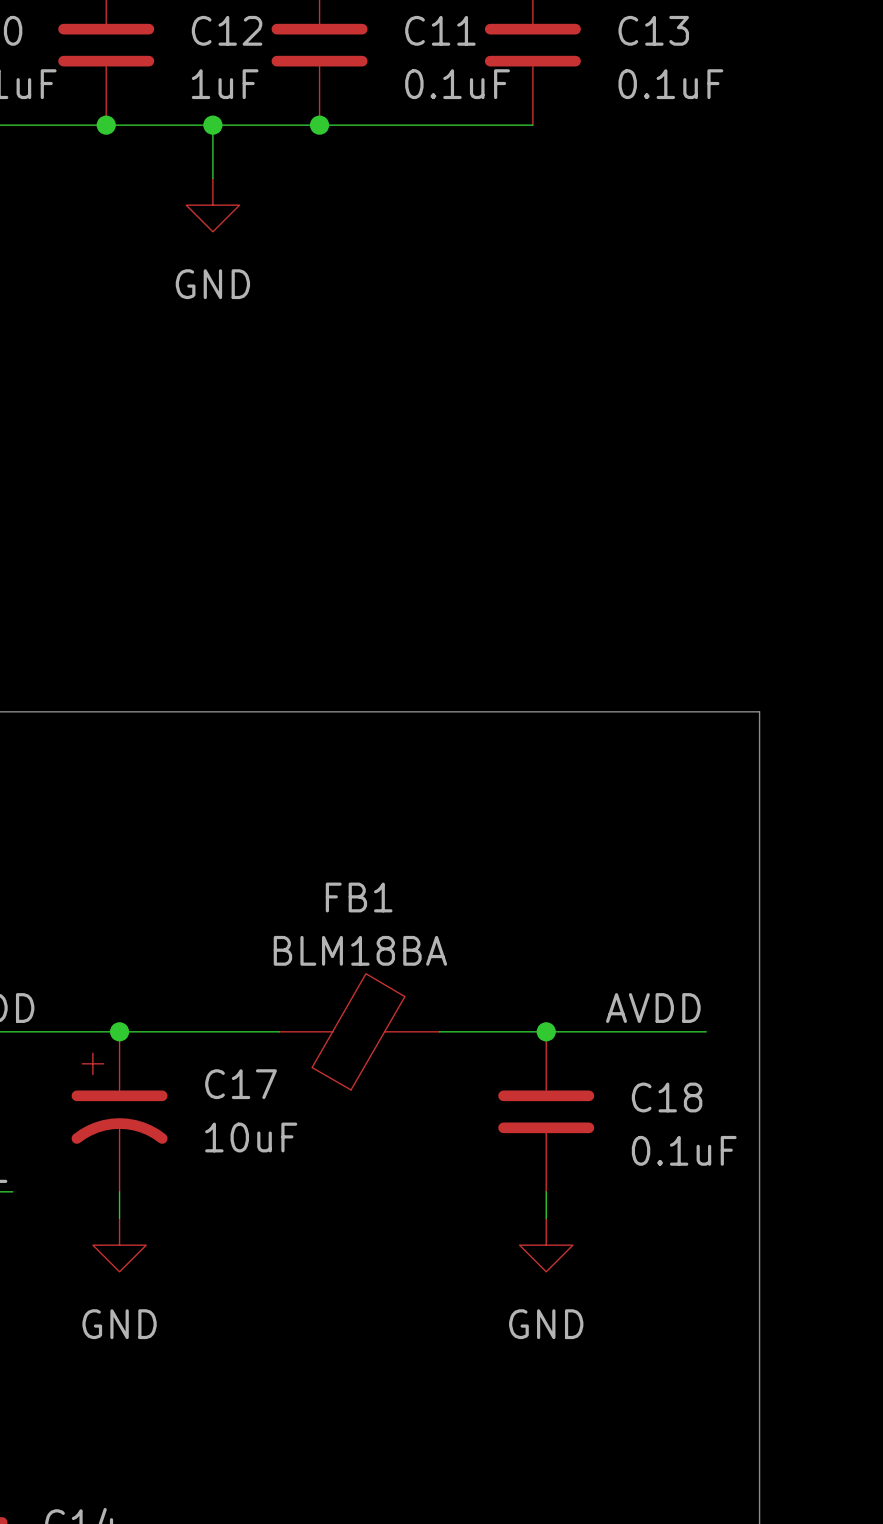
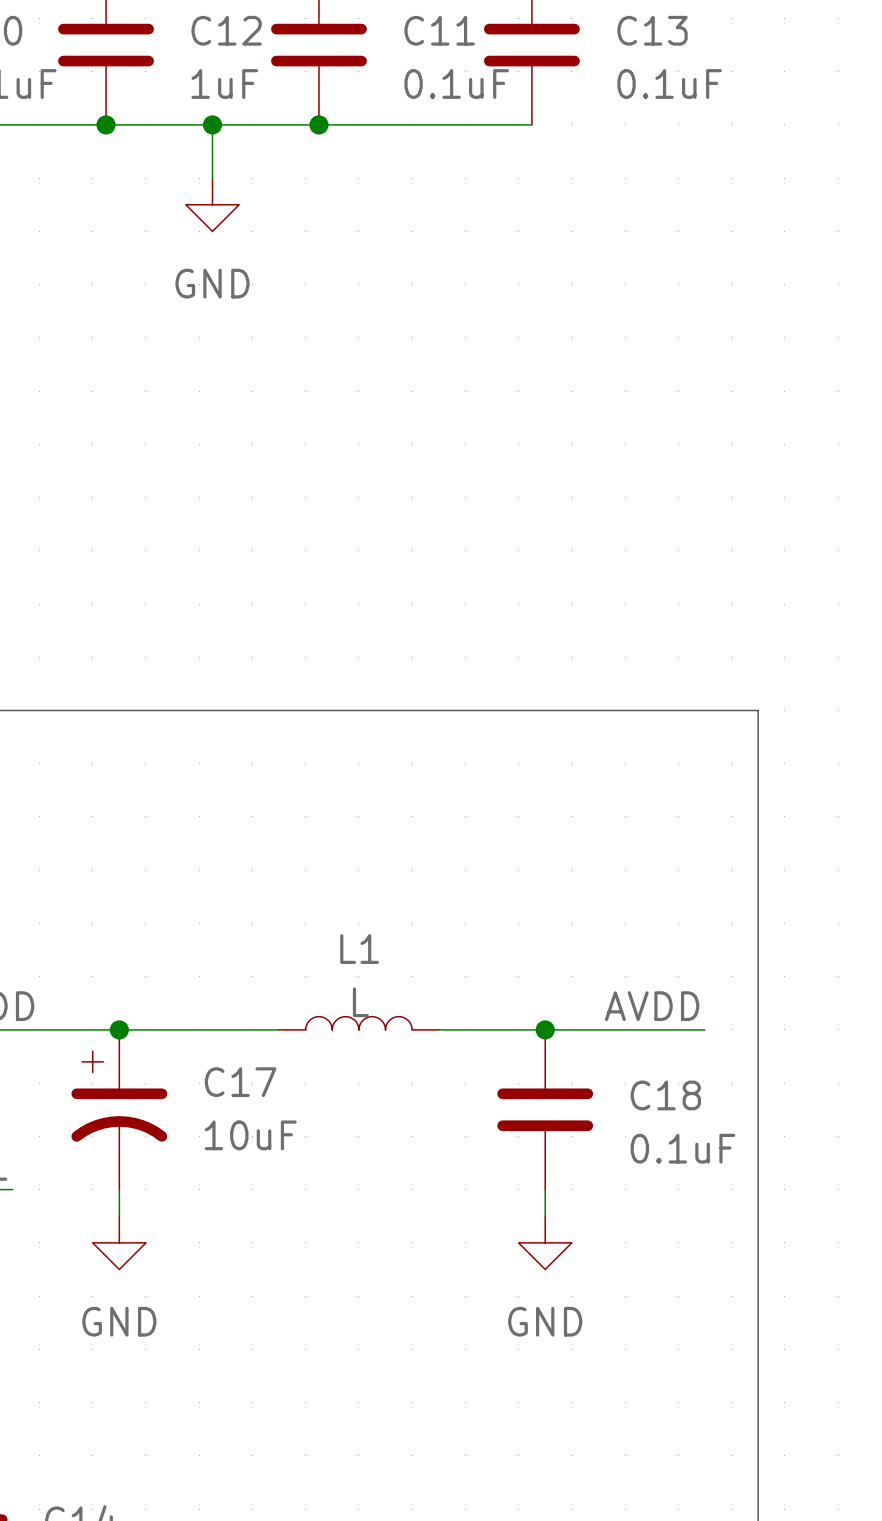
L1: none -> L (358, 1023)
FB1: BLM18BA (359, 1031) -> none

